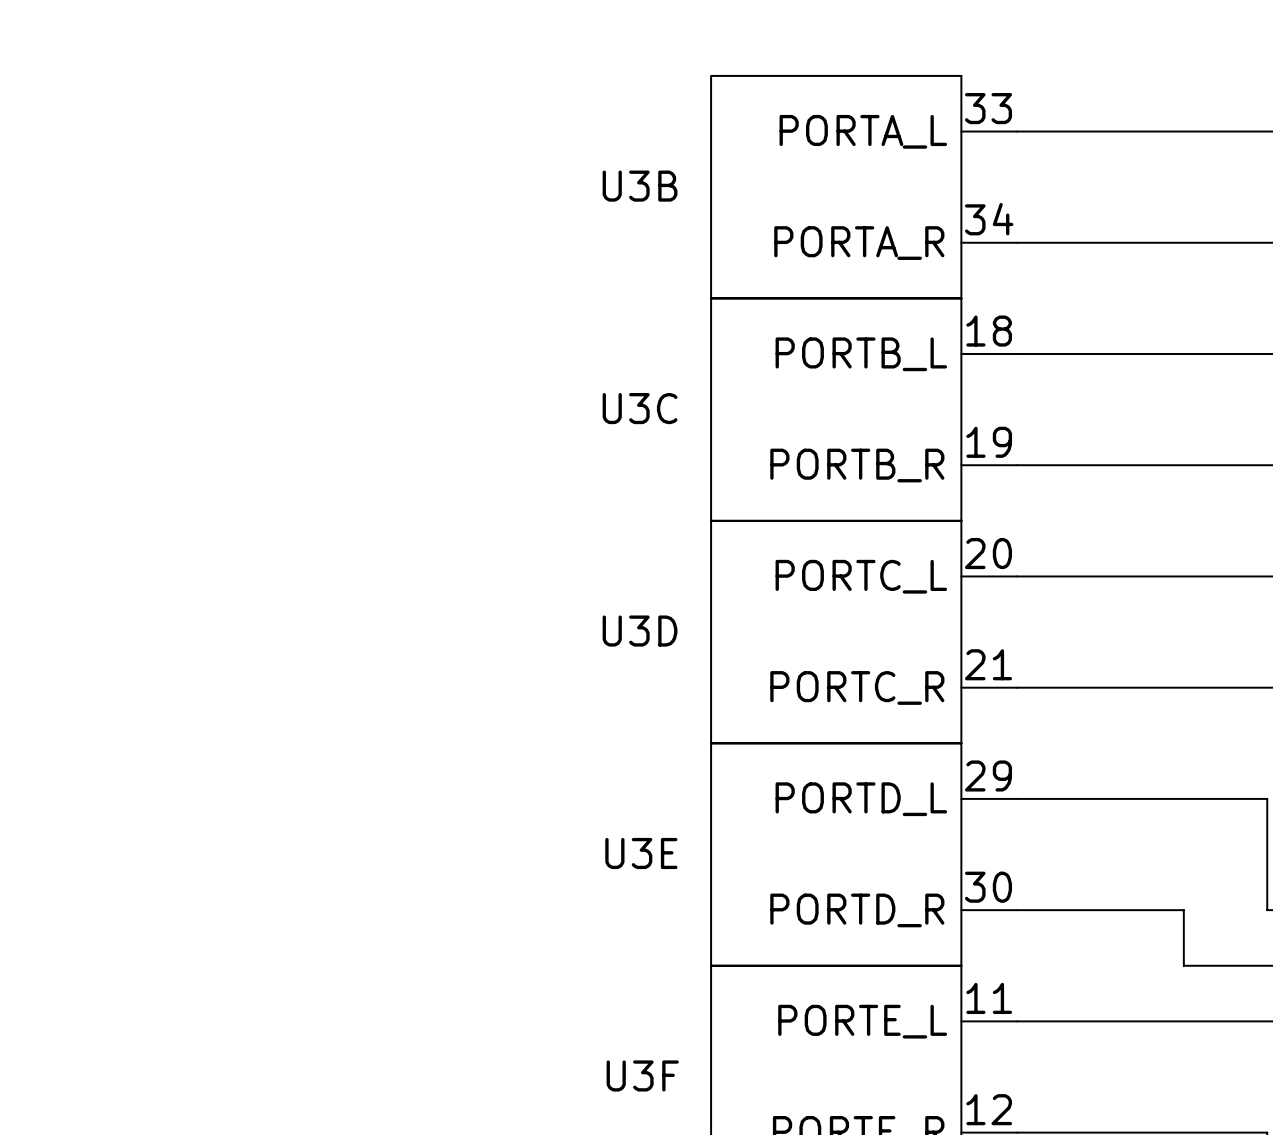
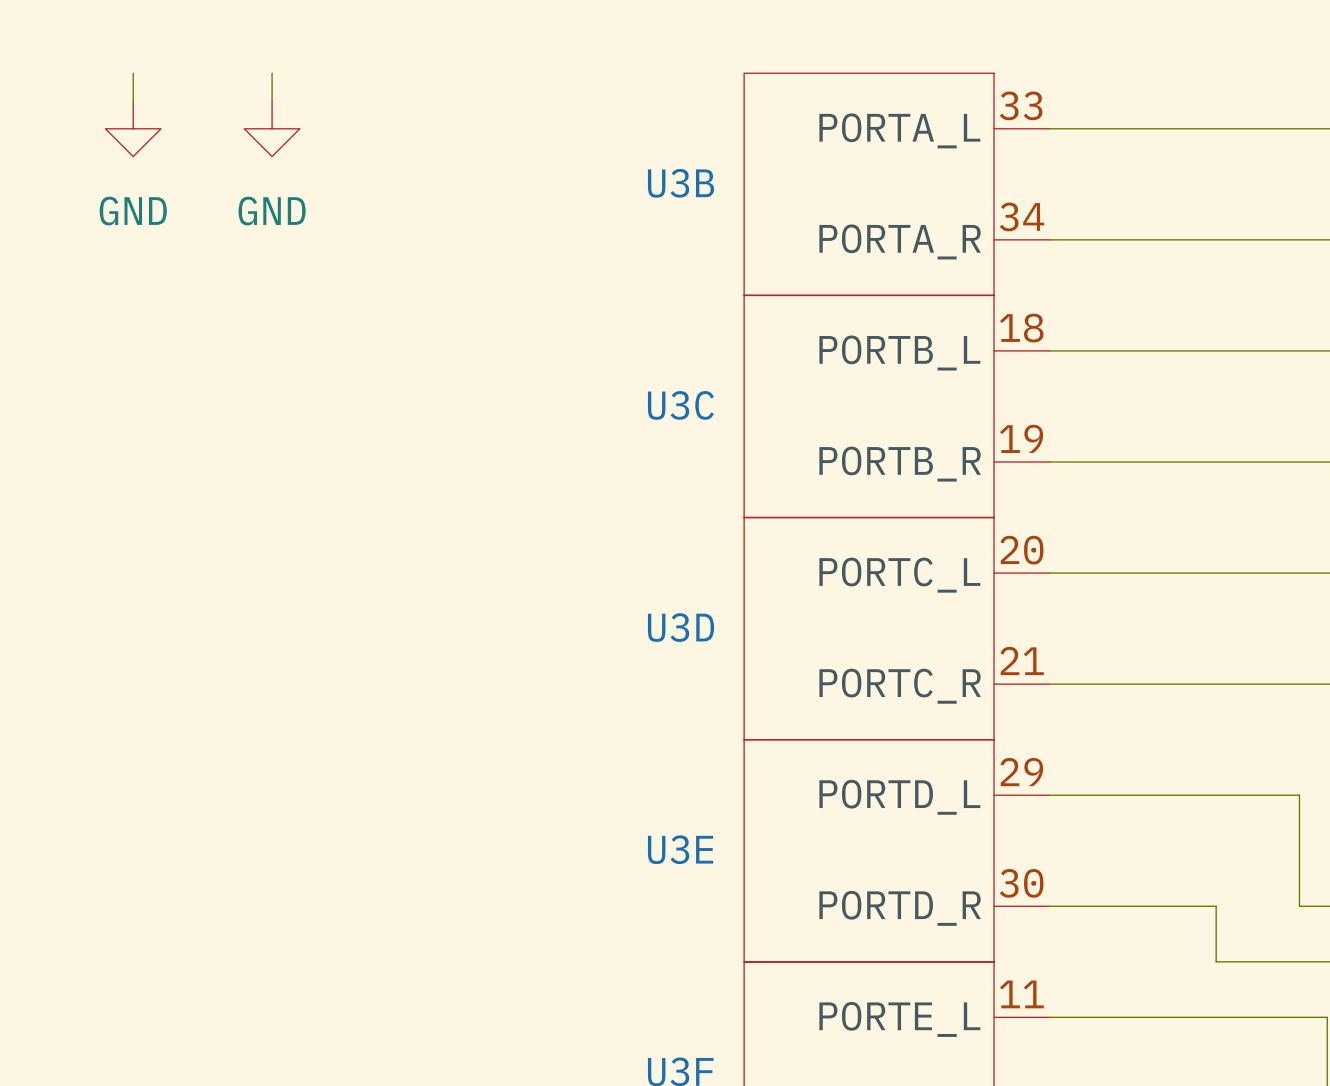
wire: none -> (133, 73) (133, 101)
wire: none -> (272, 73) (272, 101)
power symbol: none -> GND (133, 128)
power symbol: none -> GND (272, 128)

